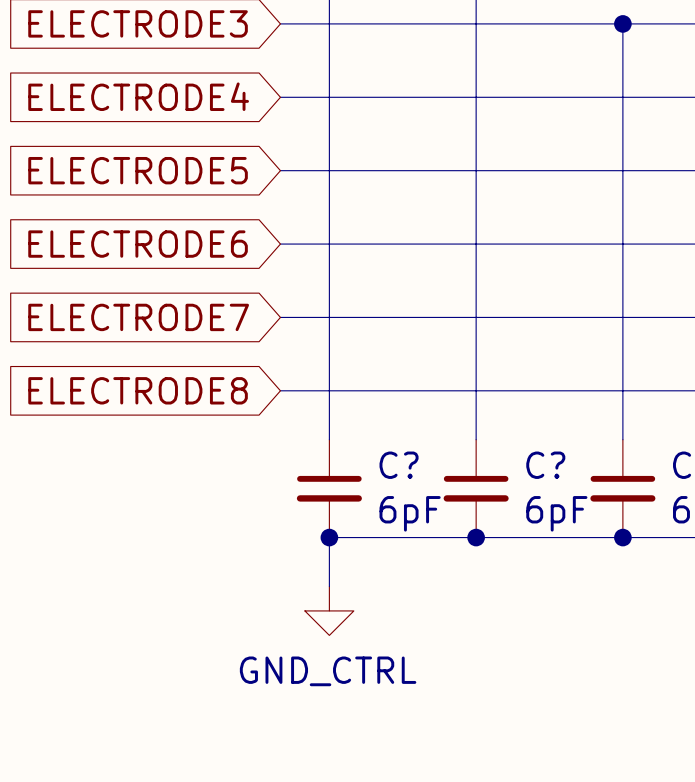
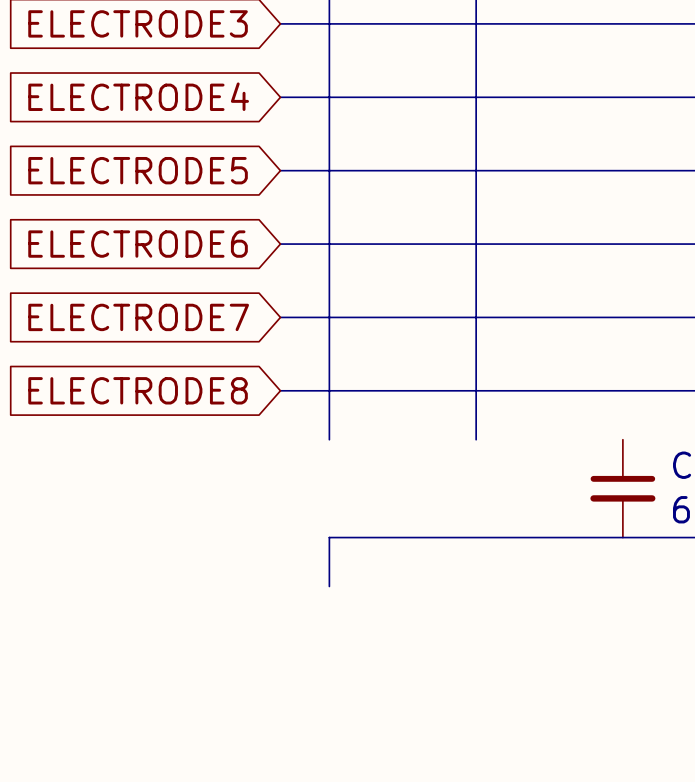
wire: (622, 23) (622, 439) -> none
junction: (622, 23) -> none
C?: 6pF (329, 488) -> none
C?: 6pF (476, 488) -> none
junction: (329, 537) -> none
junction: (476, 537) -> none
junction: (622, 537) -> none
power symbol: GND_CTRL (329, 610) -> none

